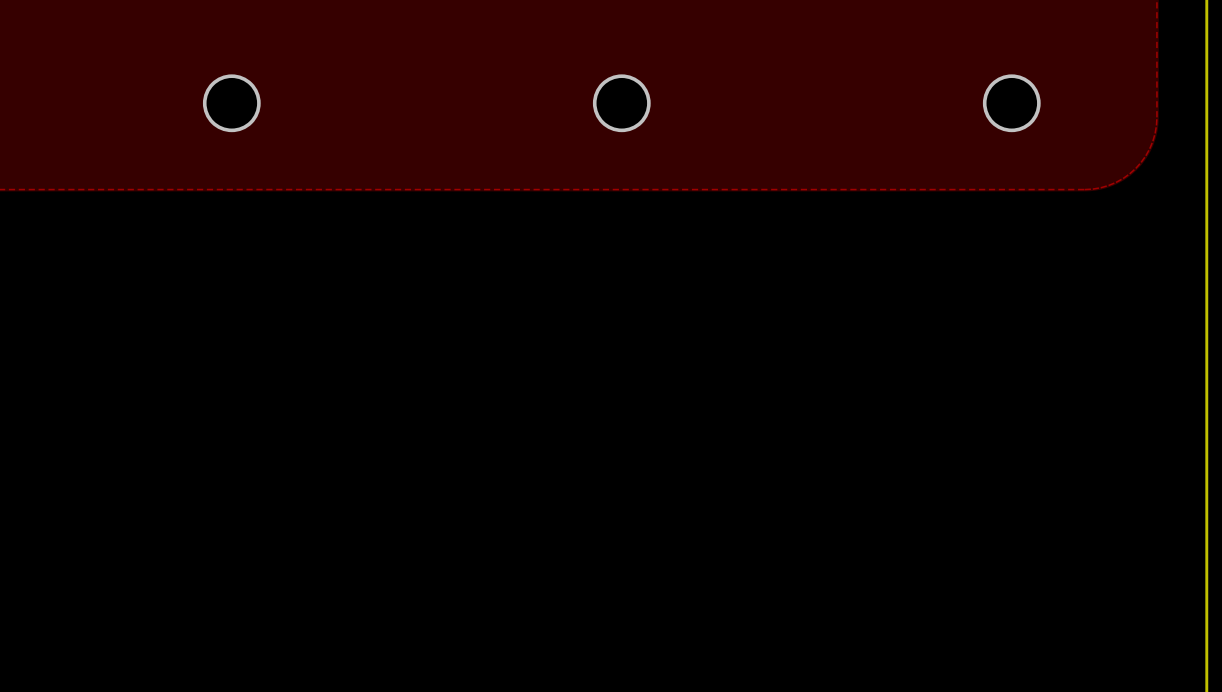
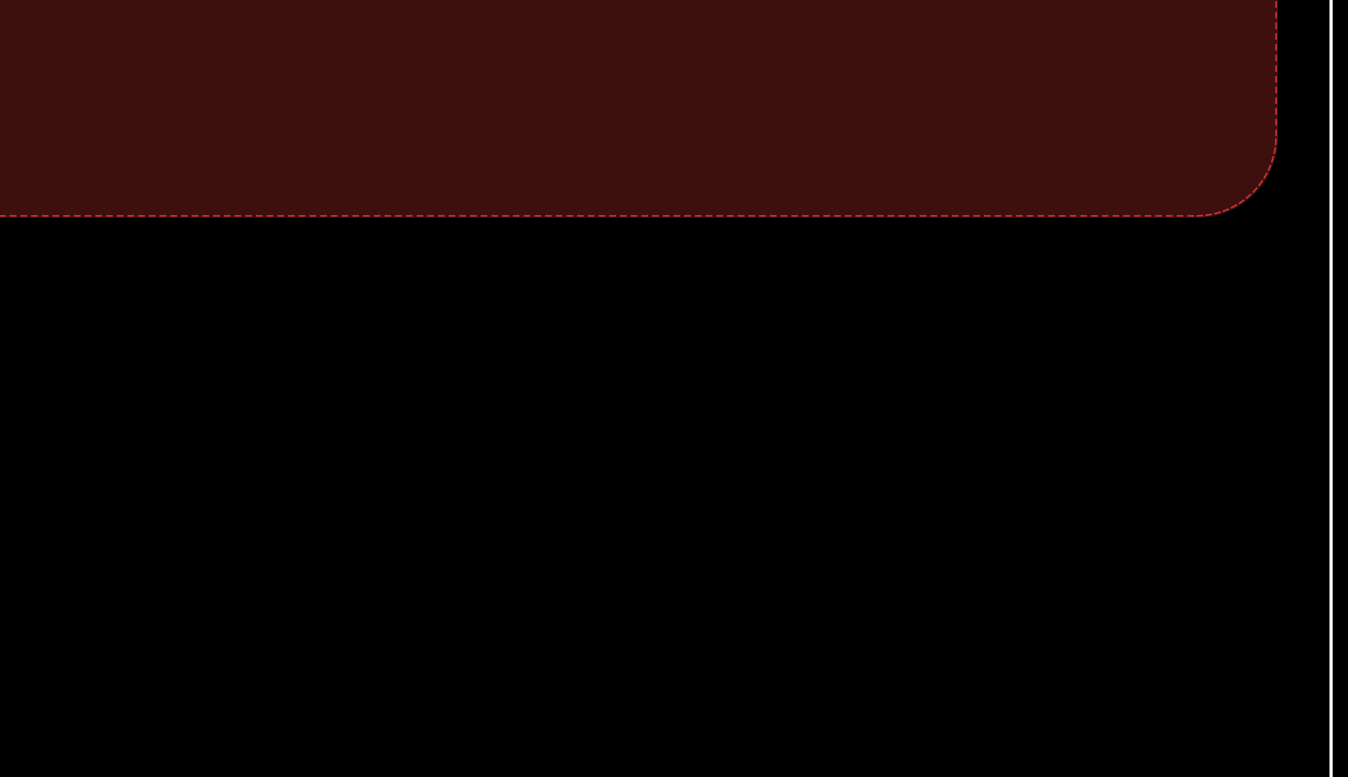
via: (231, 103) -> none
via: (621, 103) -> none
via: (1011, 103) -> none

